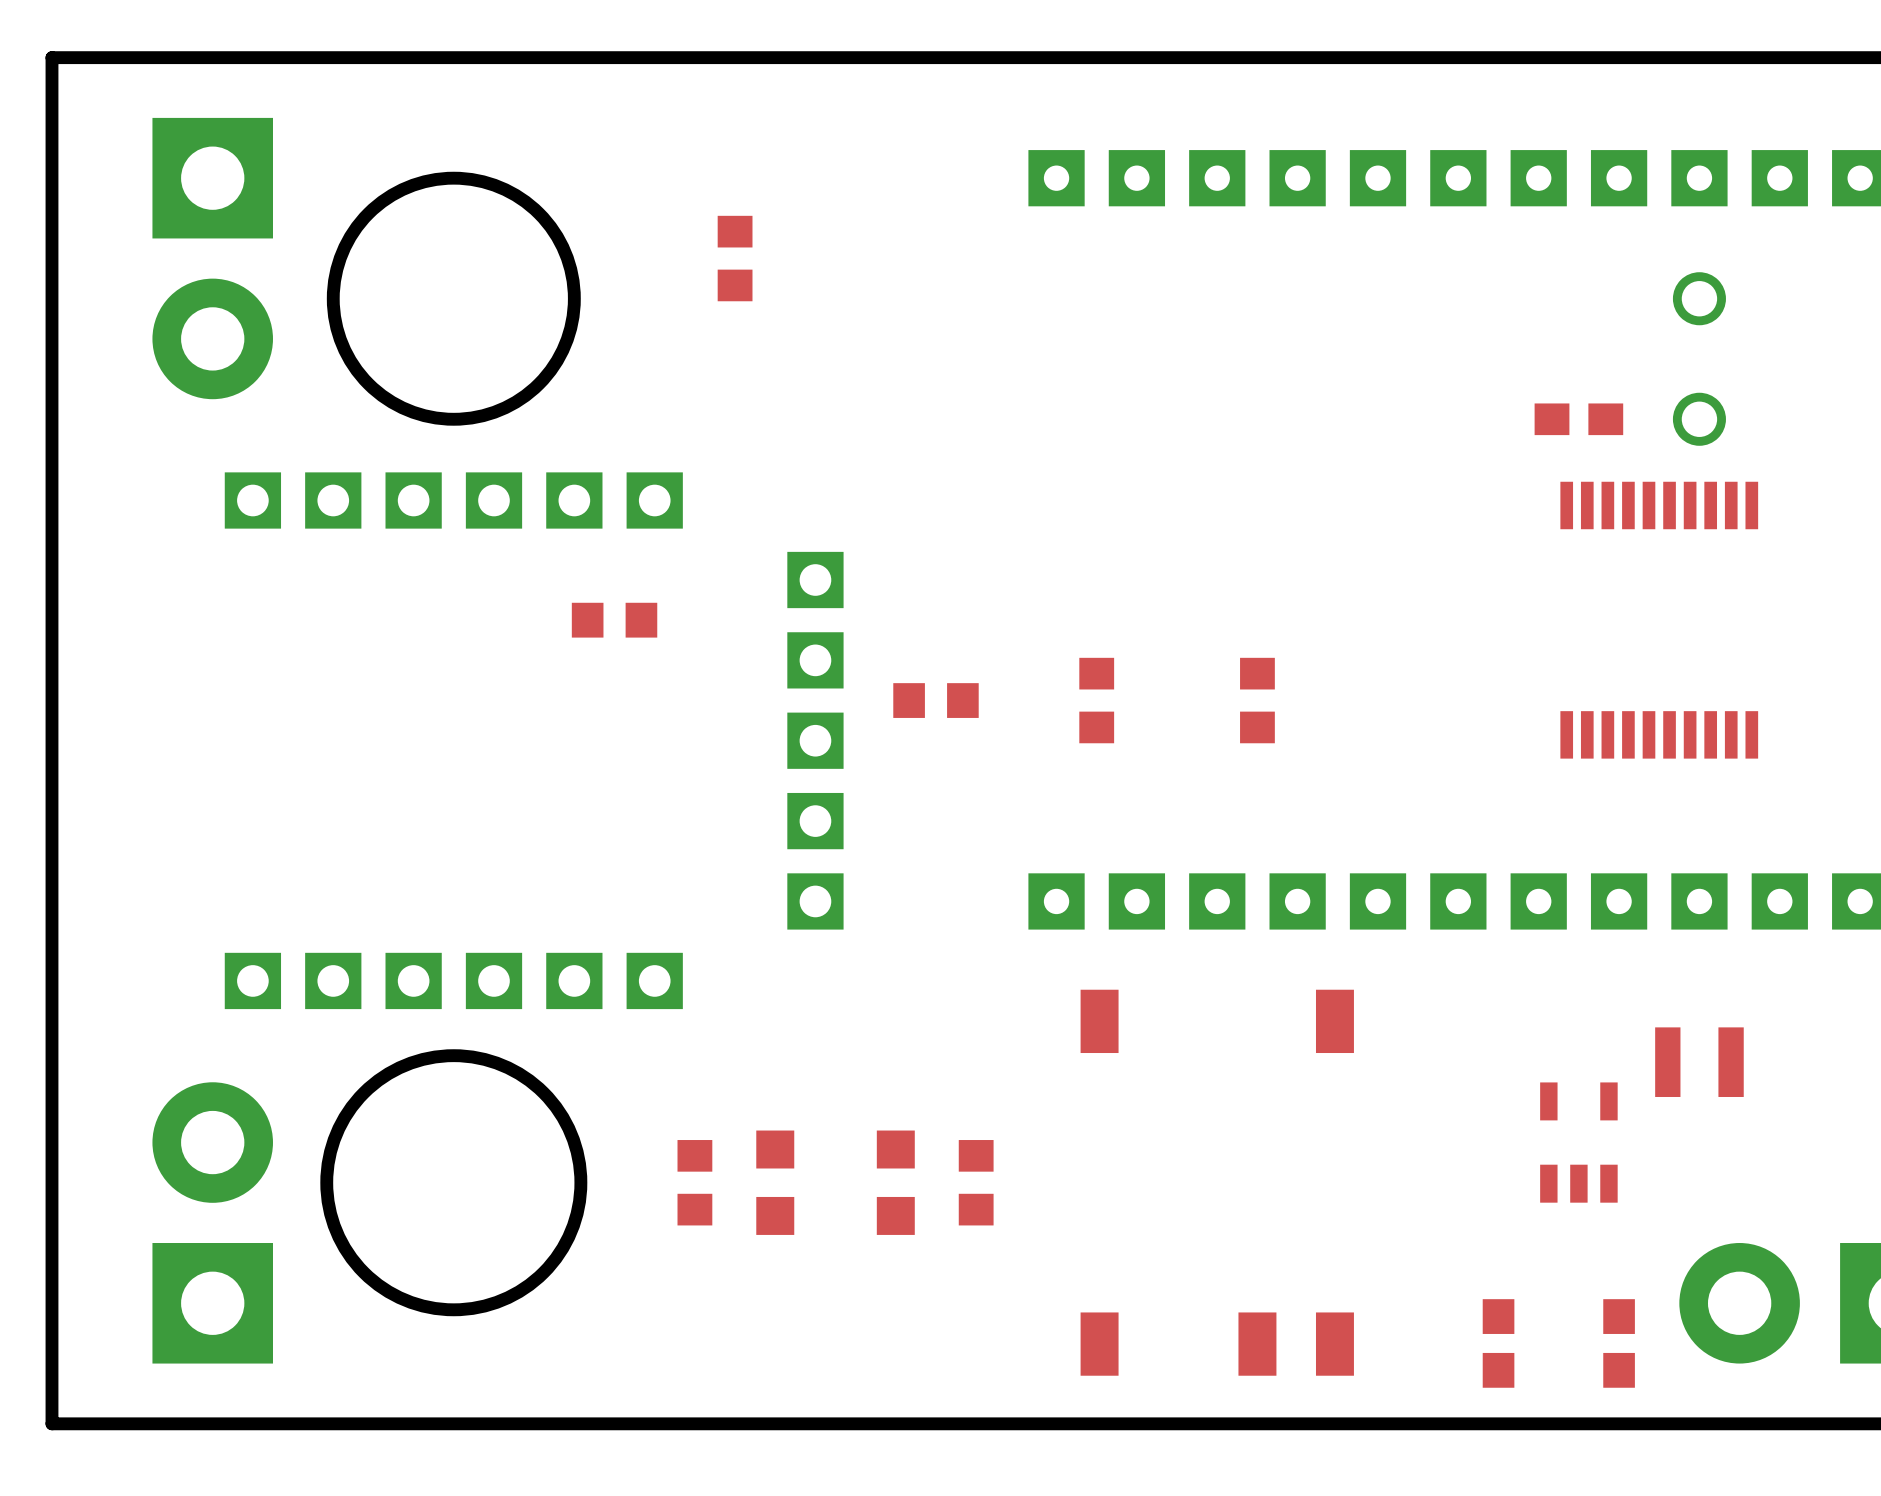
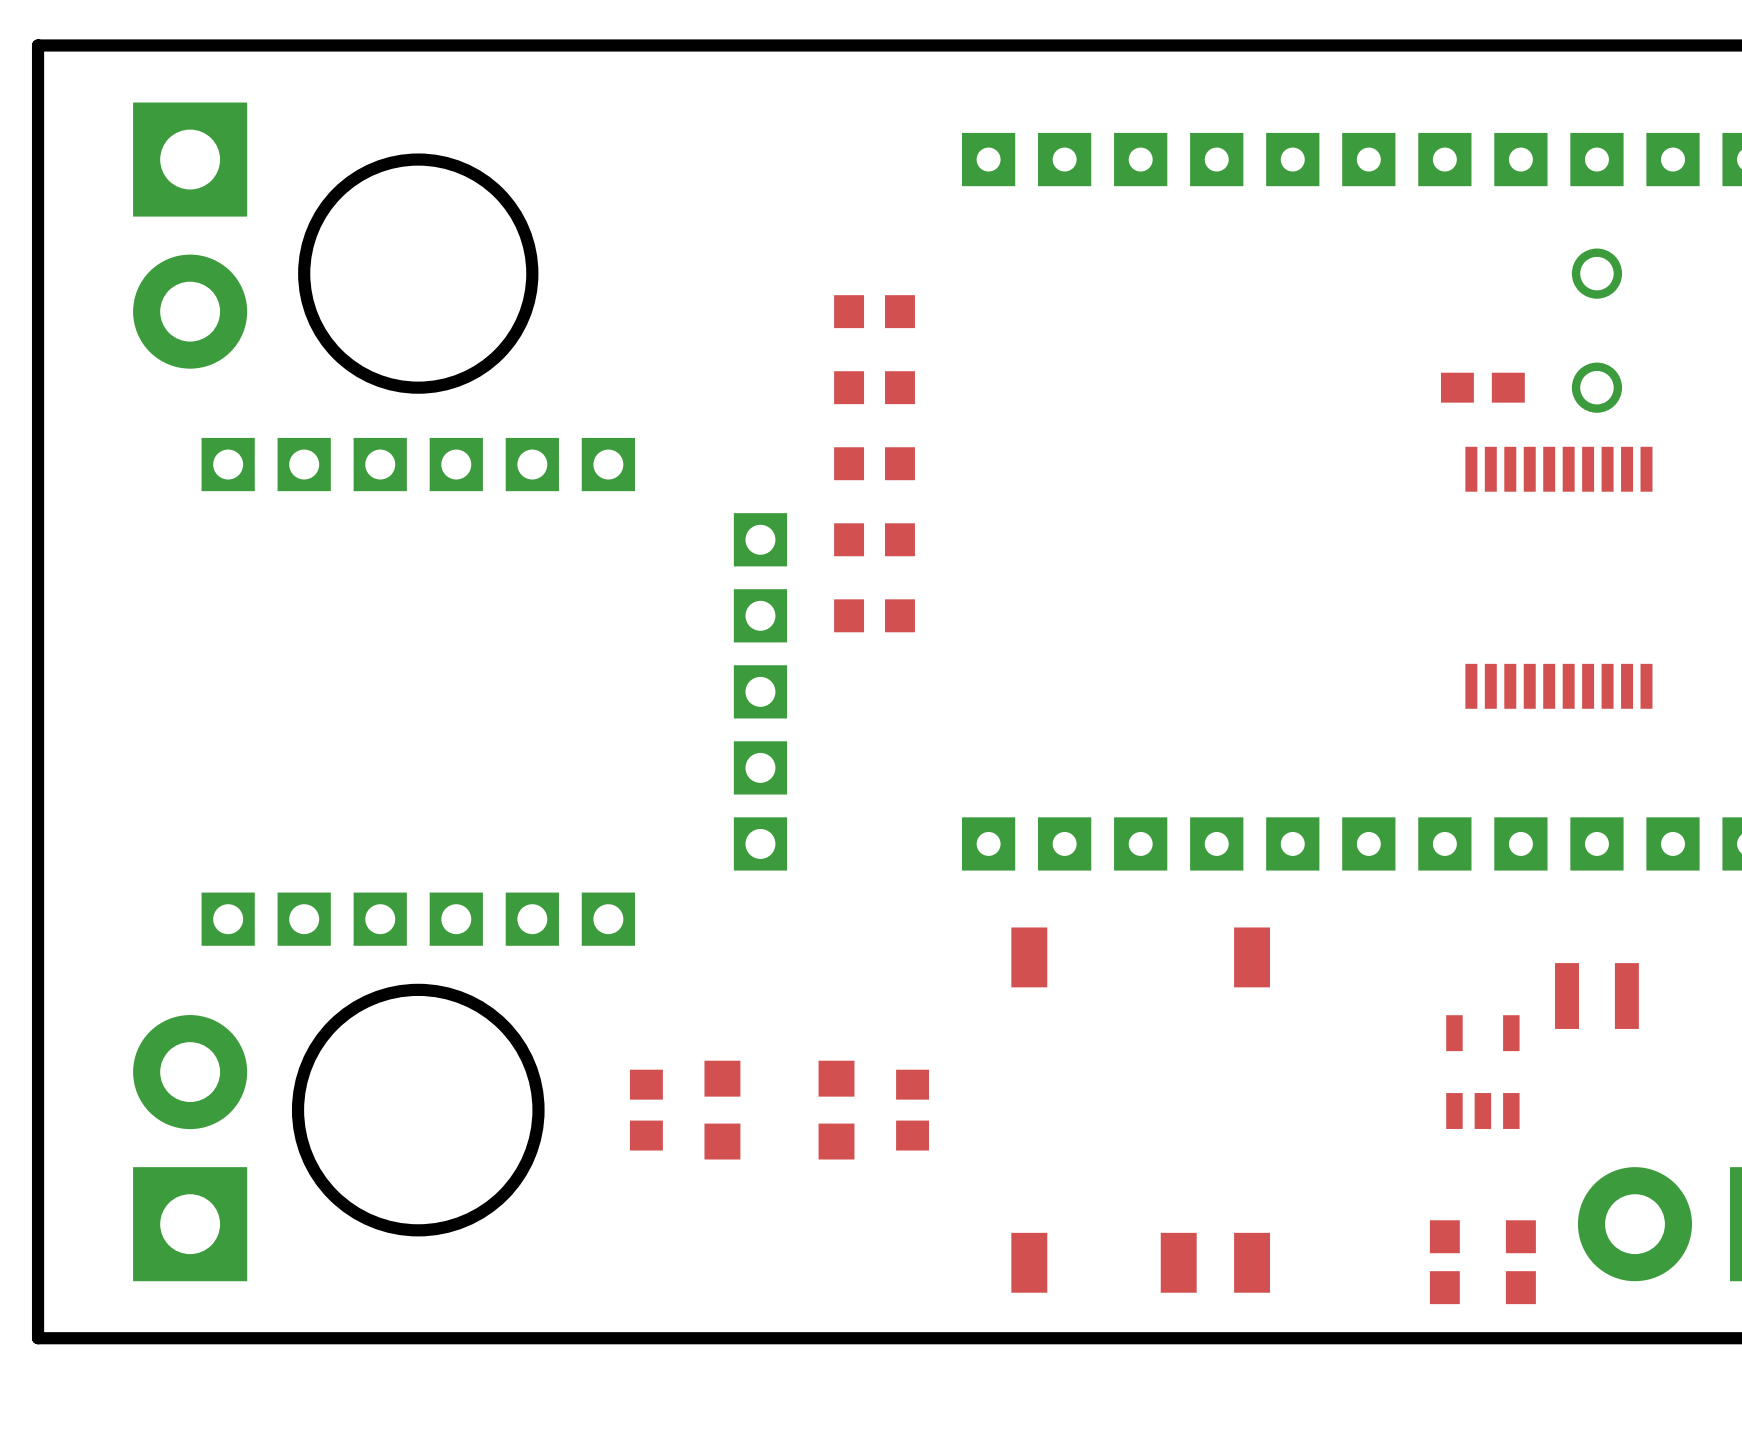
part: (735, 258) -> none
part: none -> (874, 311)
part: none -> (874, 387)
part: none -> (874, 463)
part: none -> (874, 539)
part: (614, 620) -> none
part position: (935, 700) -> (874, 615)
part: (1096, 700) -> none
part: (1257, 700) -> none
part position: (1498, 1343) -> (1444, 1262)

